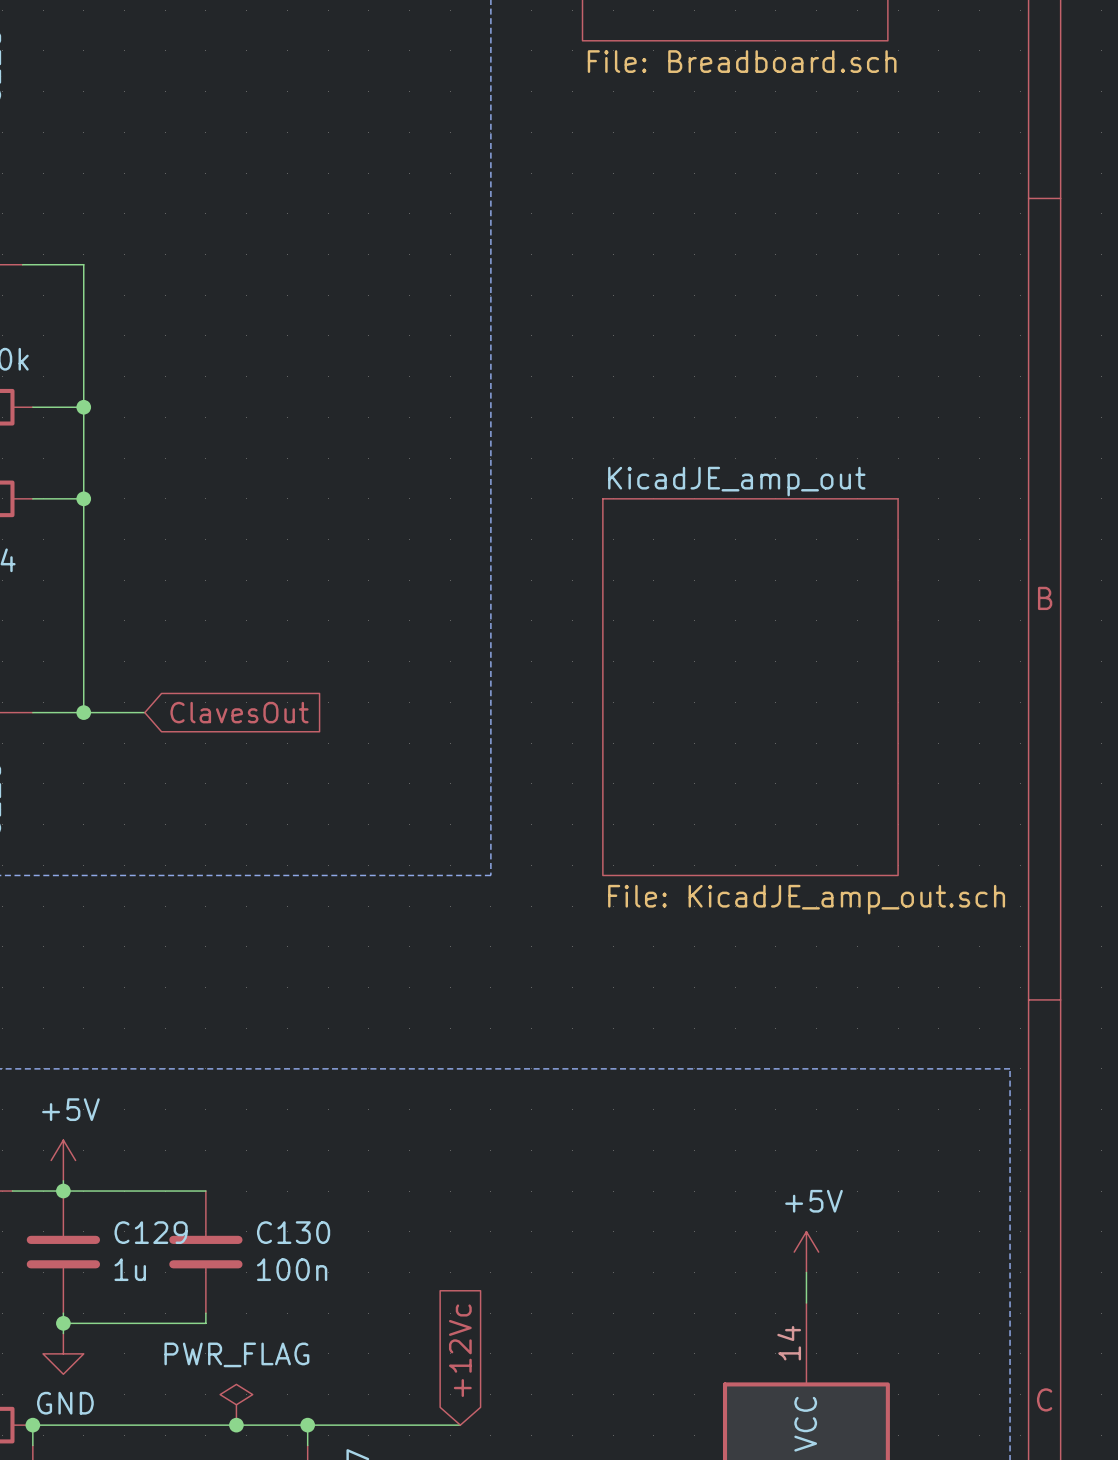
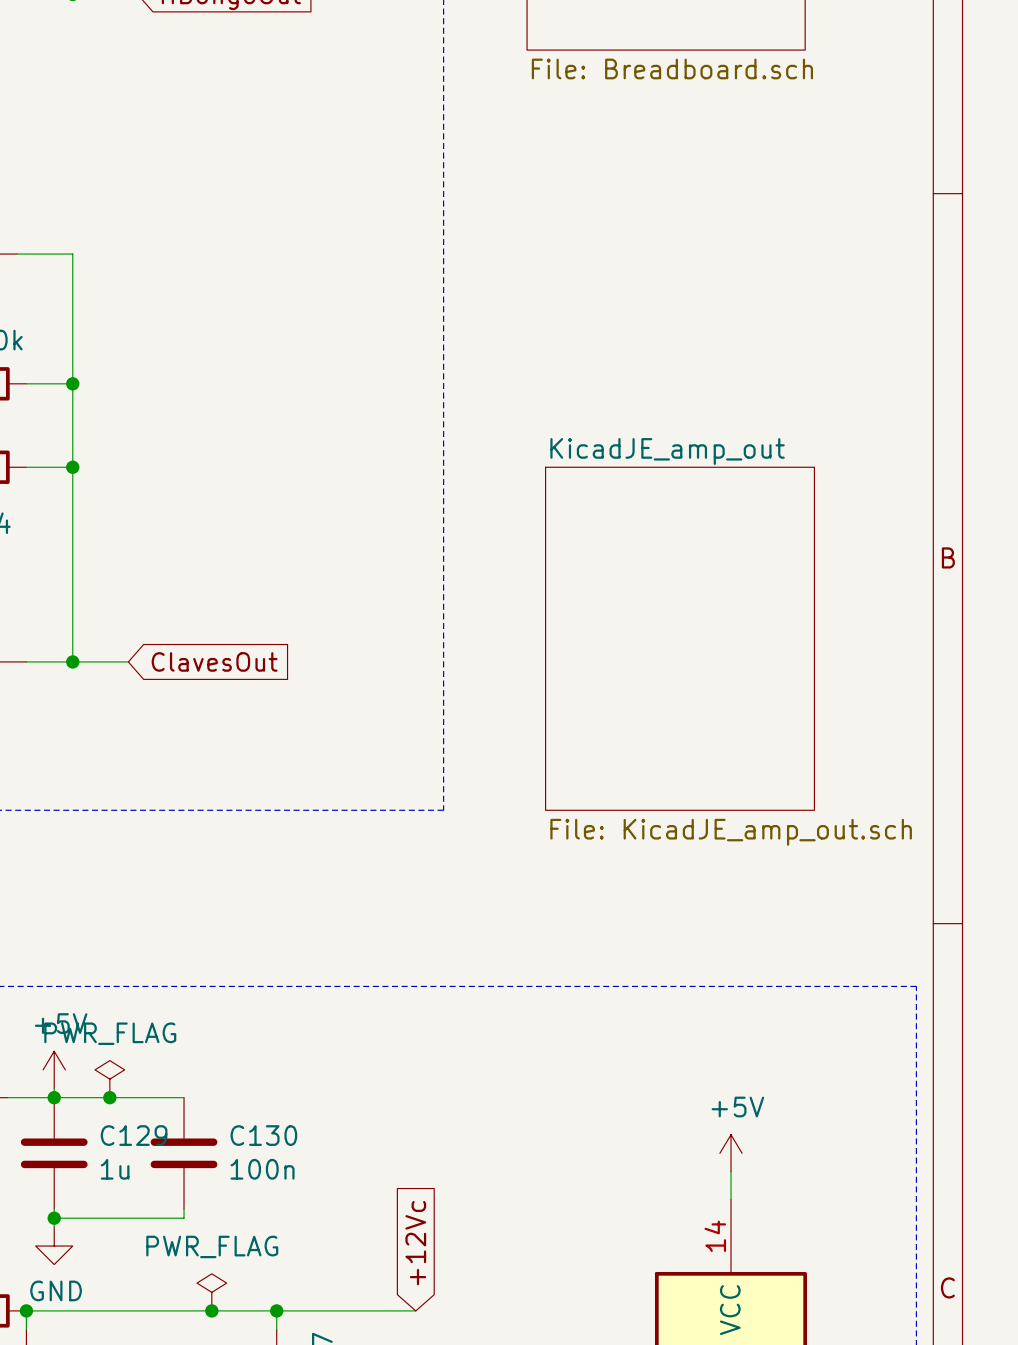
power symbol: none -> PWR_FLAG (109, 1079)
junction: none -> (109, 1097)

